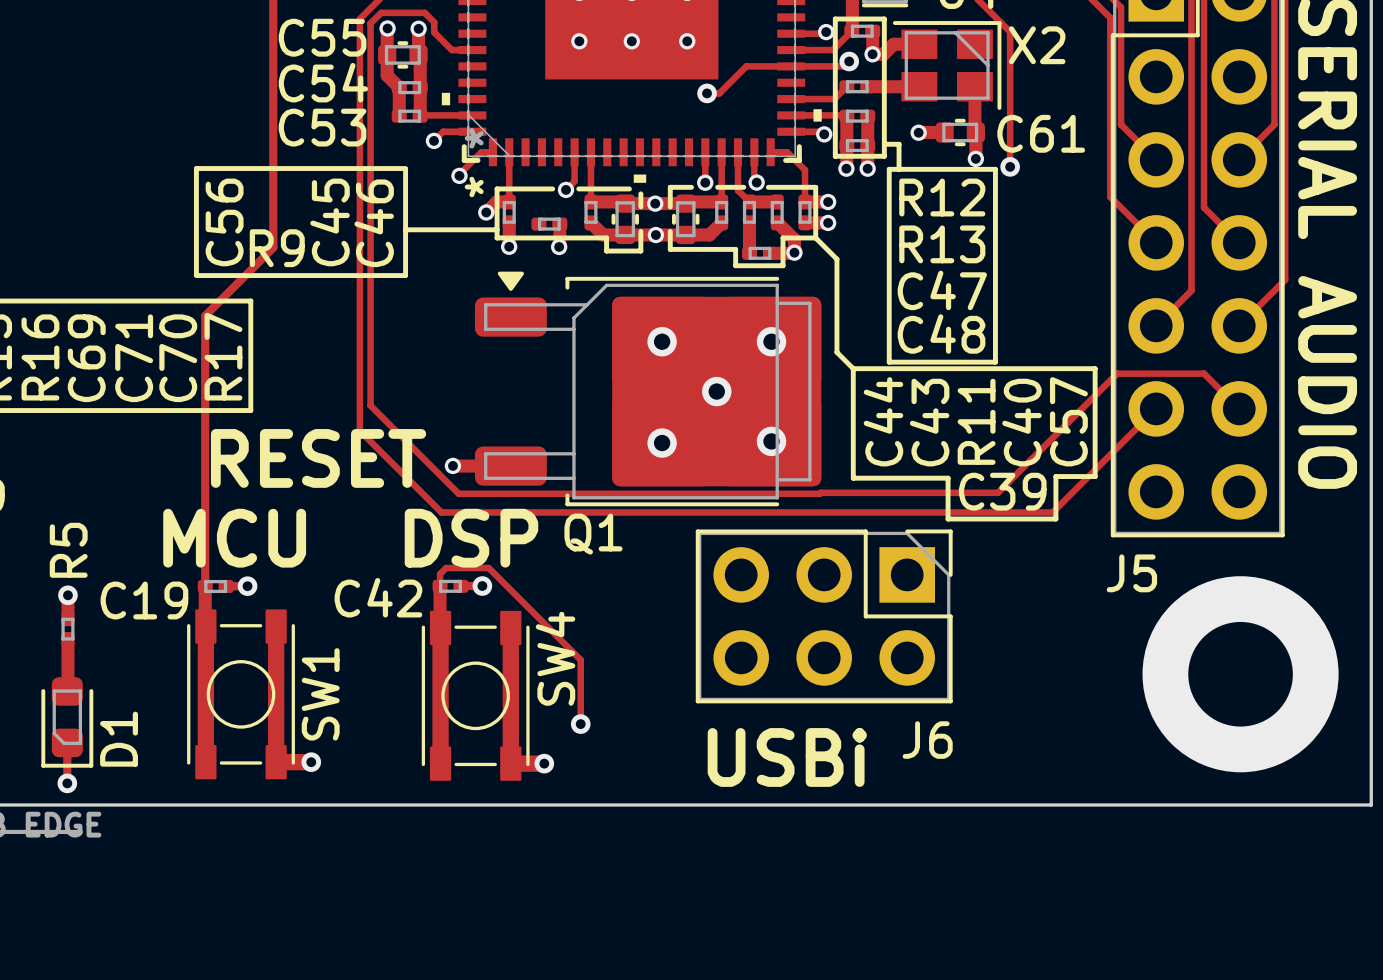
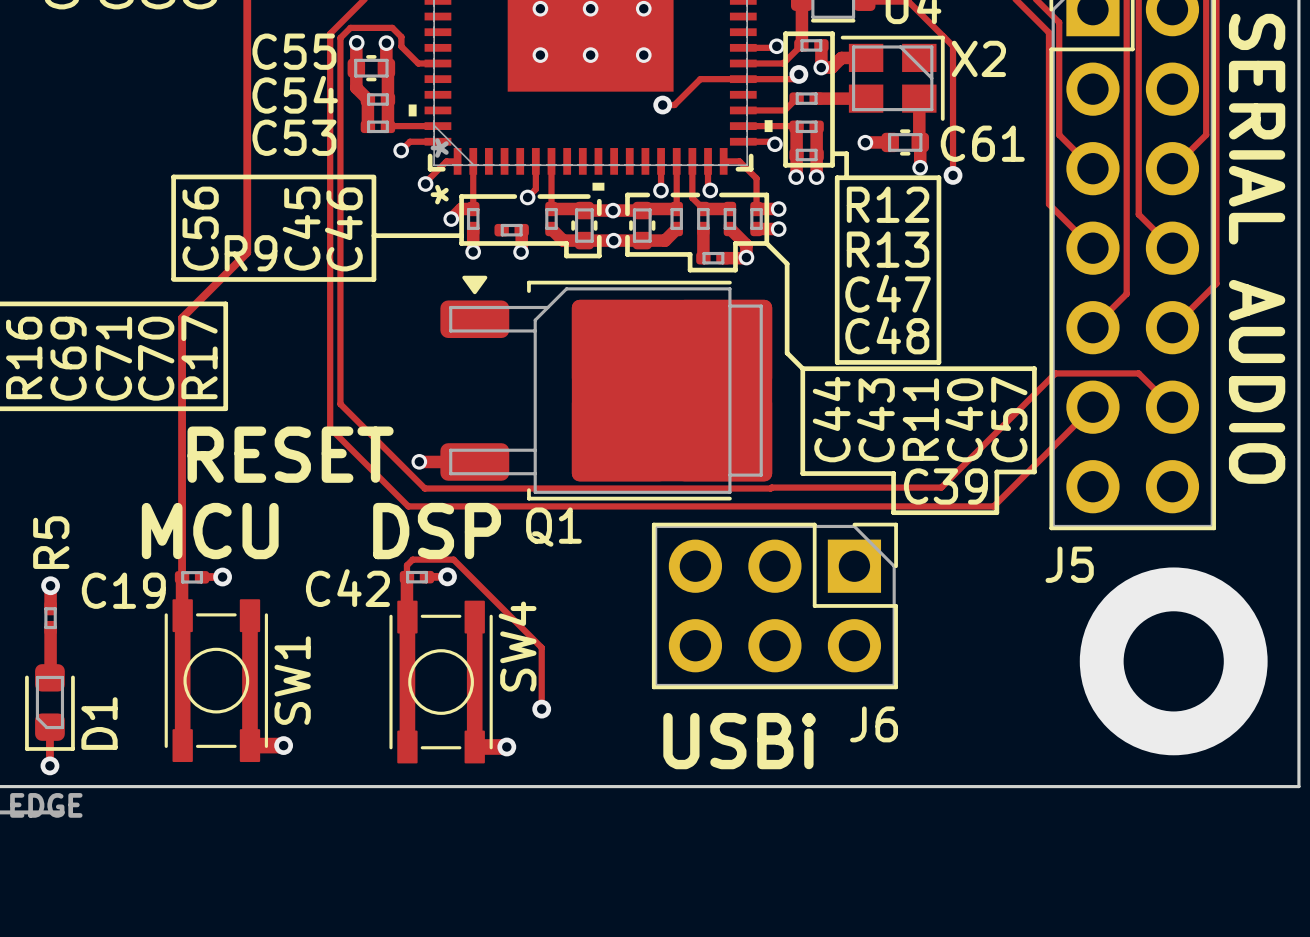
via: (662, 341) -> none
via: (771, 341) -> none
via: (716, 391) -> none
via: (771, 441) -> none
via: (662, 443) -> none

